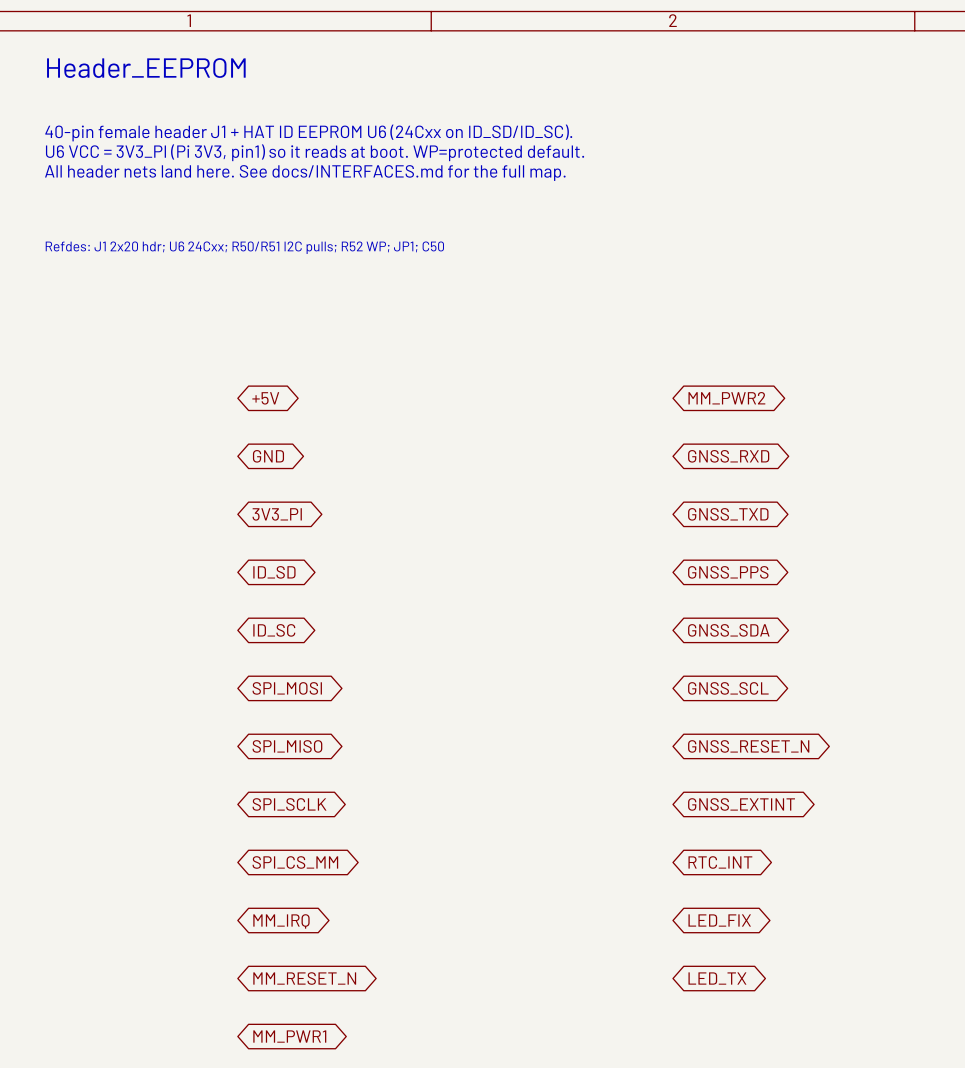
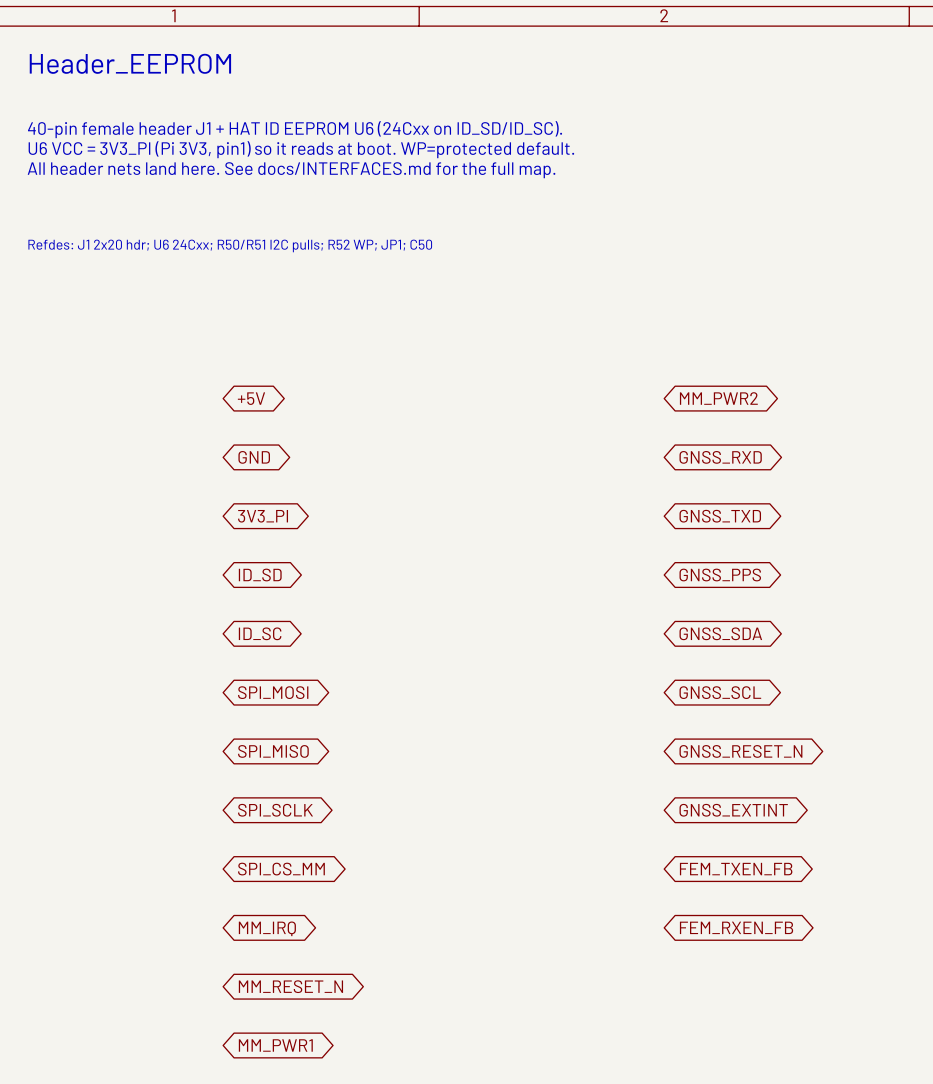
global label: RTC_INT (720, 862) -> FEM_TXEN_FB (736, 869)
global label: LED_FIX (719, 920) -> FEM_RXEN_FB (736, 927)
global label: LED_TX (717, 978) -> none

